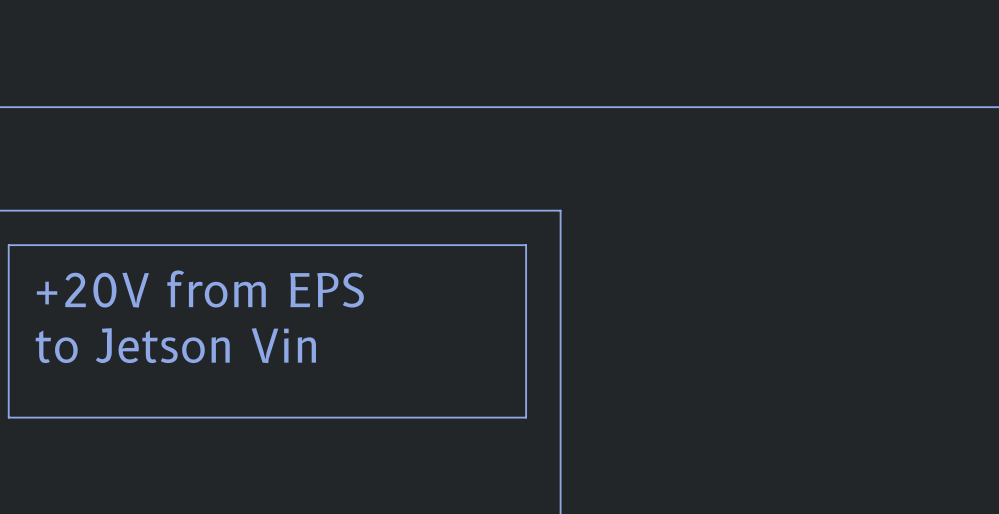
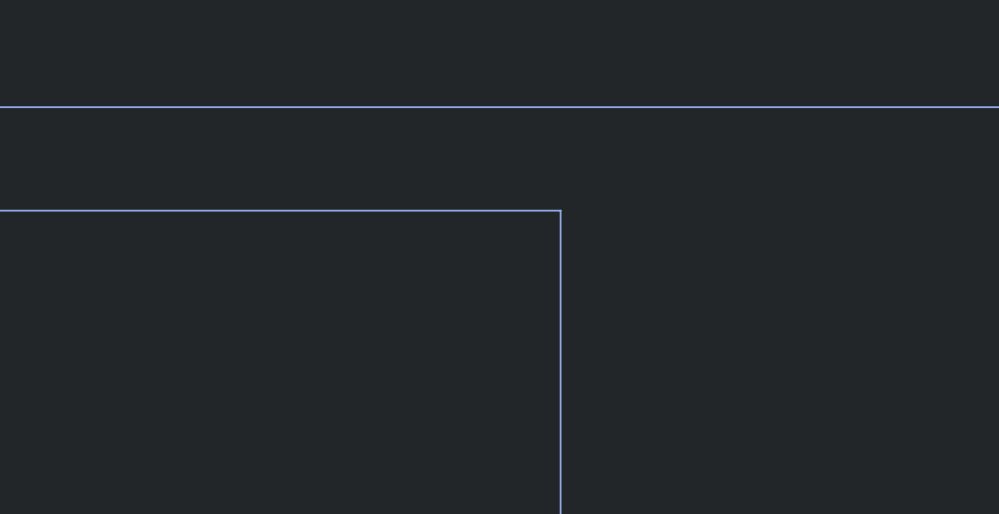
line: (8, 245) (526, 245) (526, 417) (8, 417) (8, 245) -> none
text: +20V from EPS (200, 289) -> none
text: to Jetson Vin (175, 345) -> none

